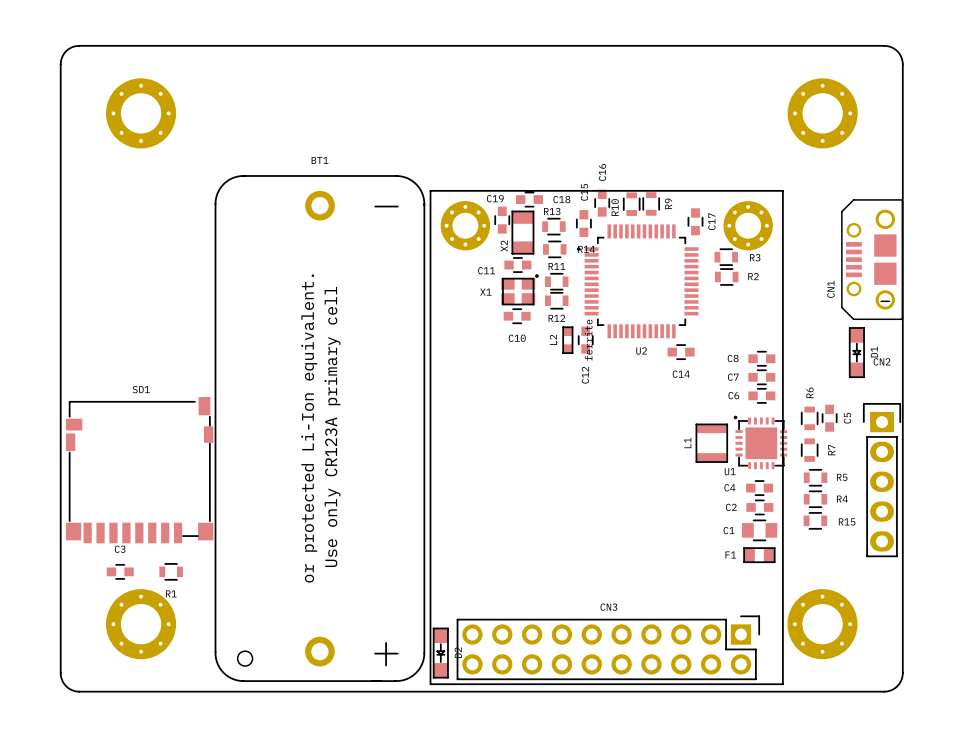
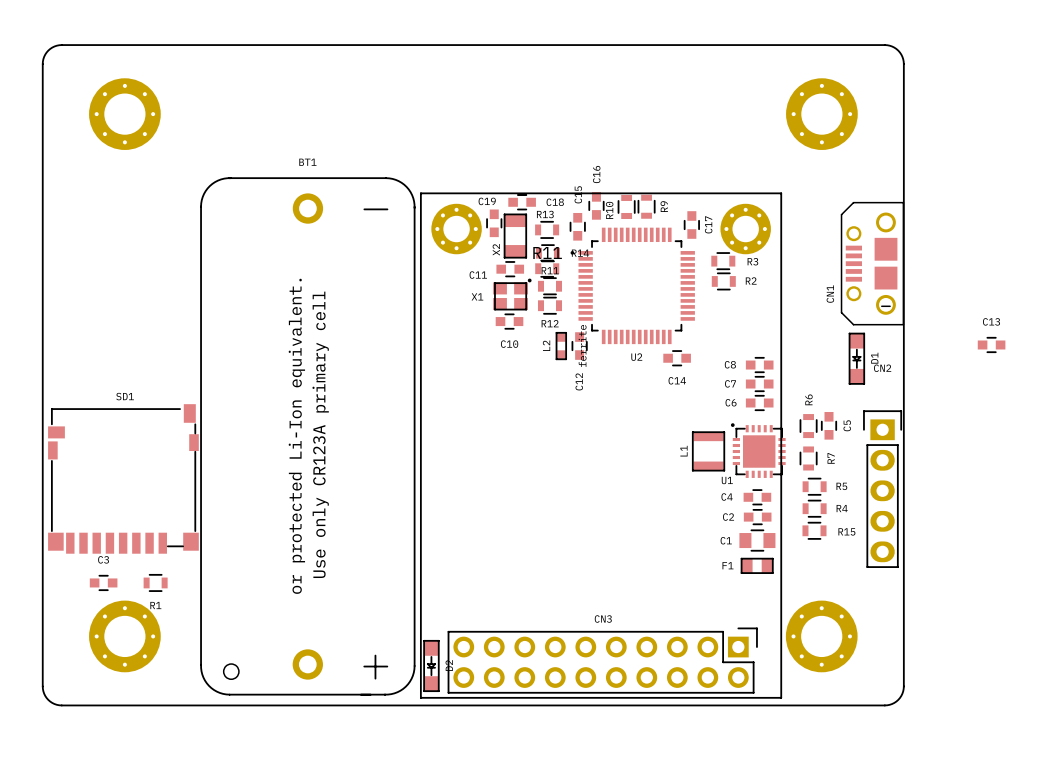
R11: none -> (547, 268)

